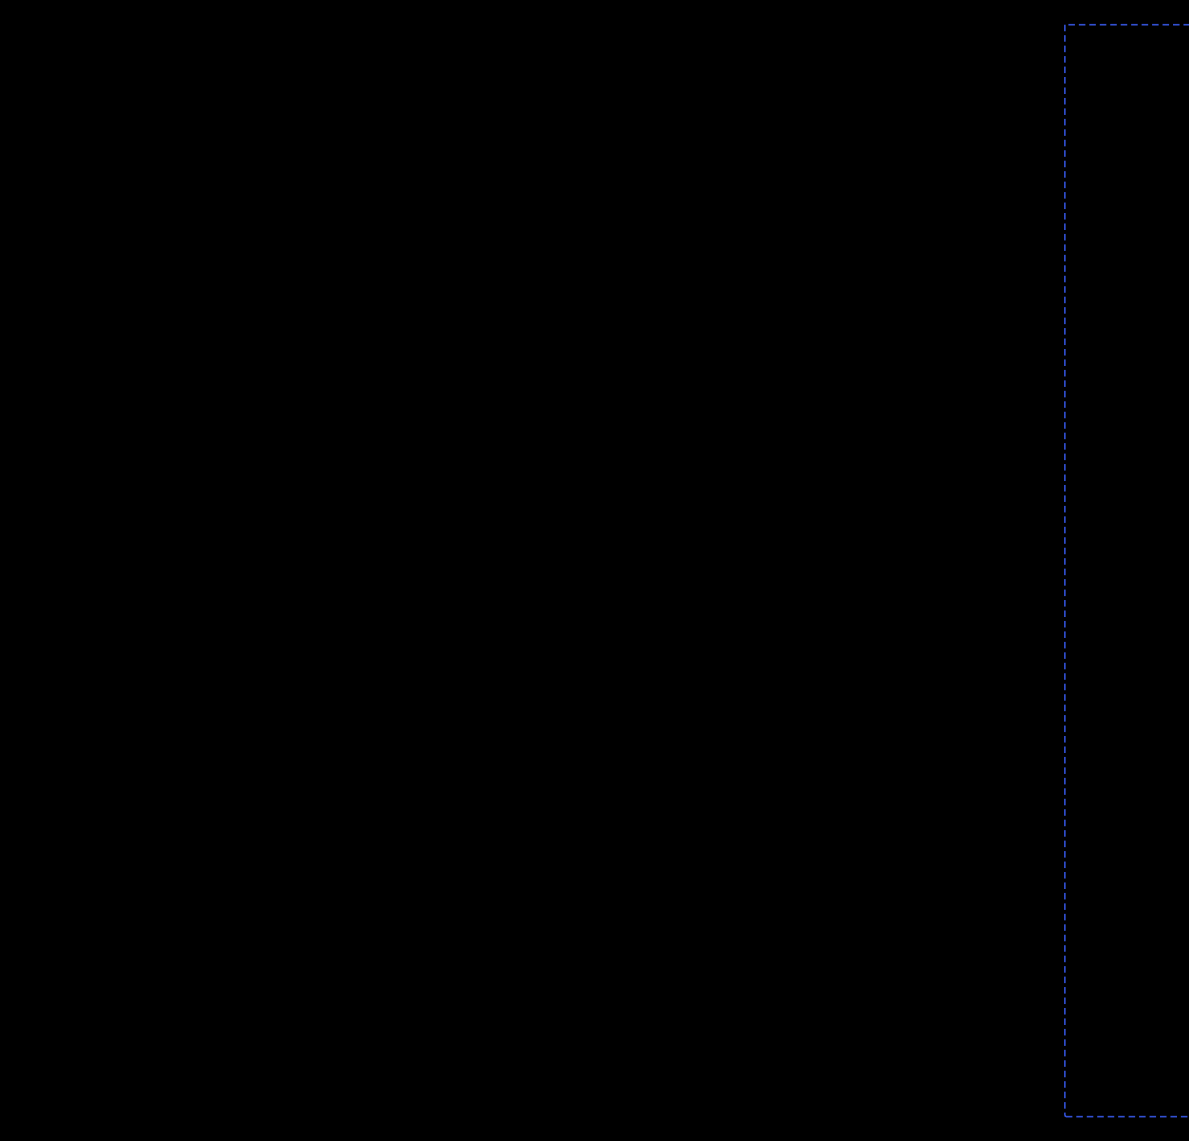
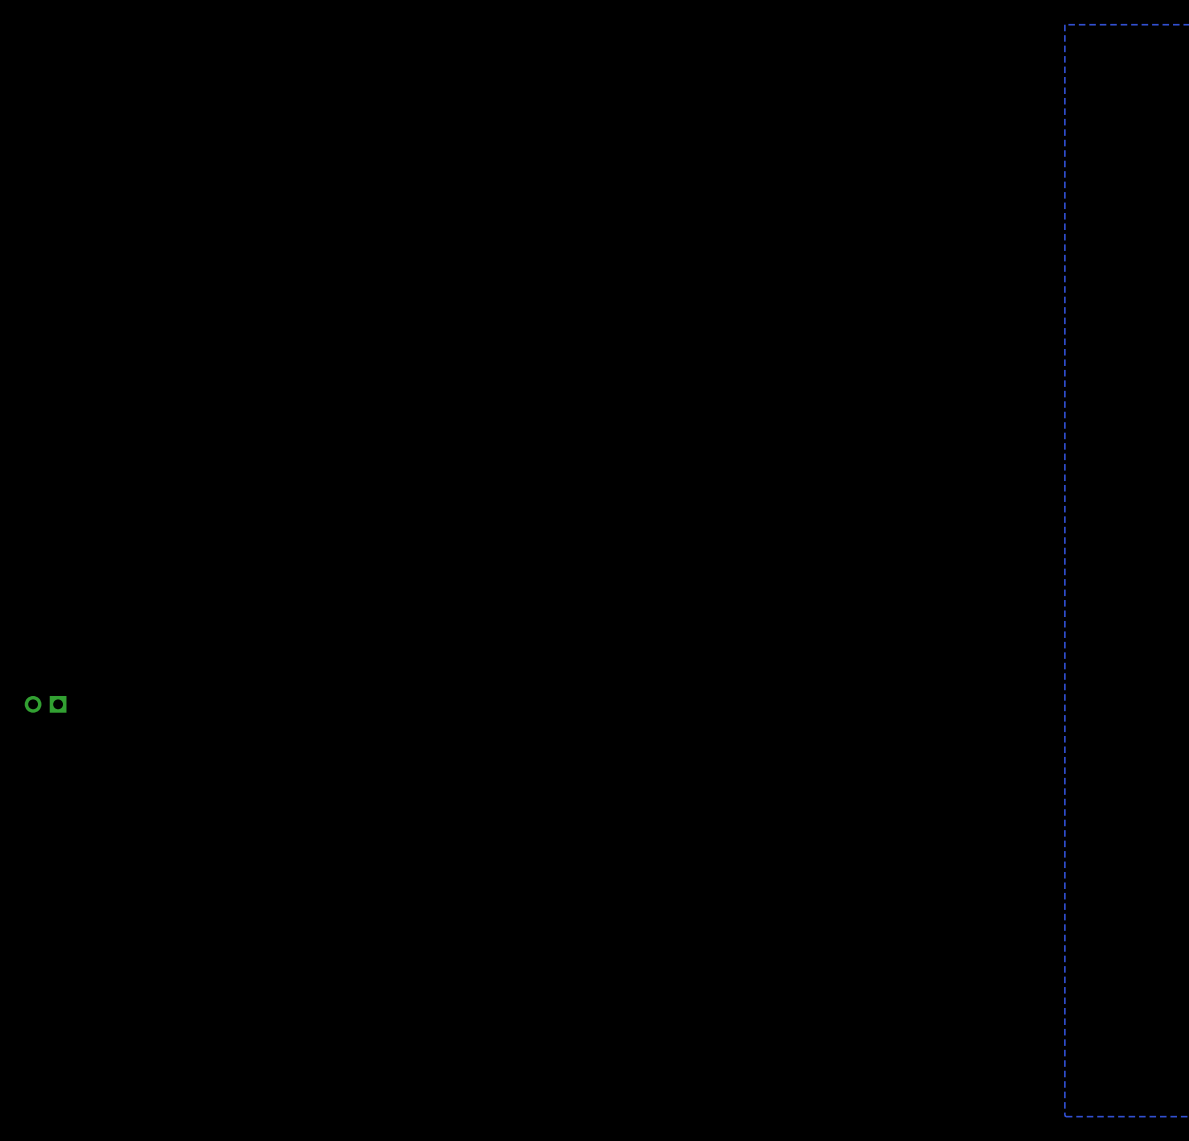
part: none -> (45, 704)

